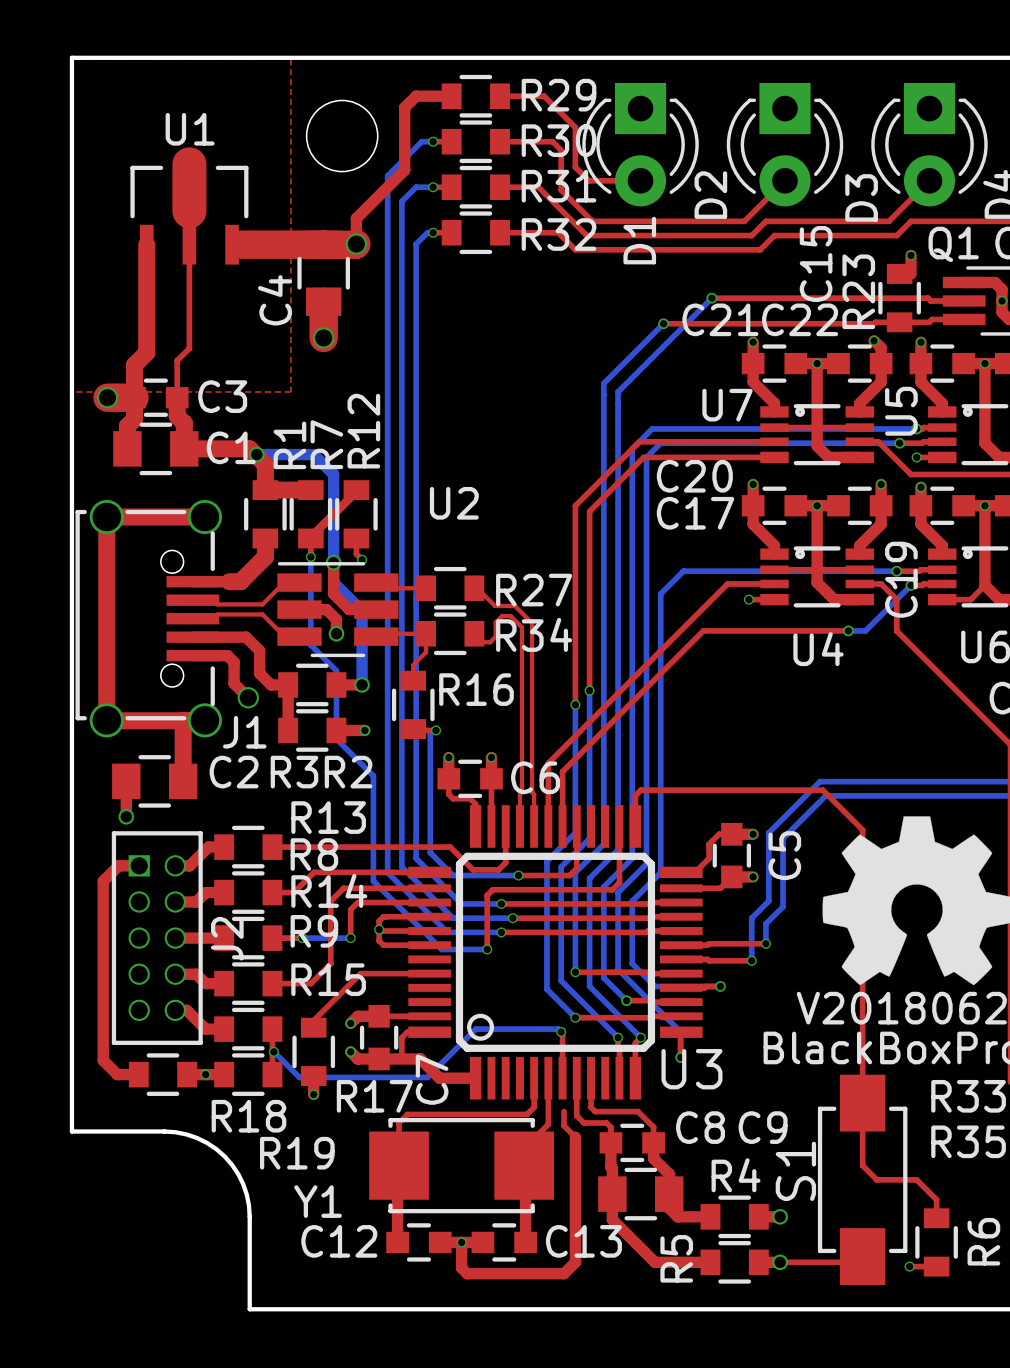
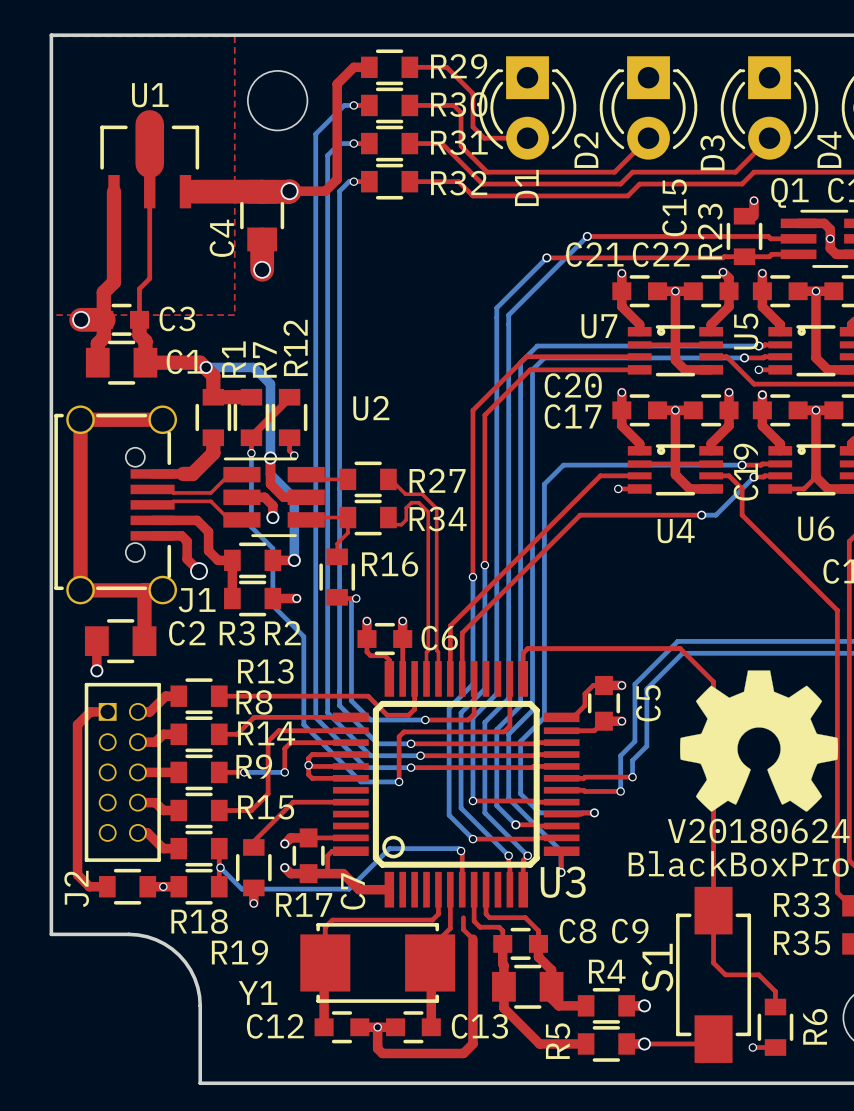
top track: (433, 96) (416, 96) (404, 107) (404, 170) (356, 218) (356, 244) -> (353, 67) (337, 84) (337, 179) (325, 191) (289, 191)
J2 name position: J2 (227, 938) -> J2 (76, 888)

